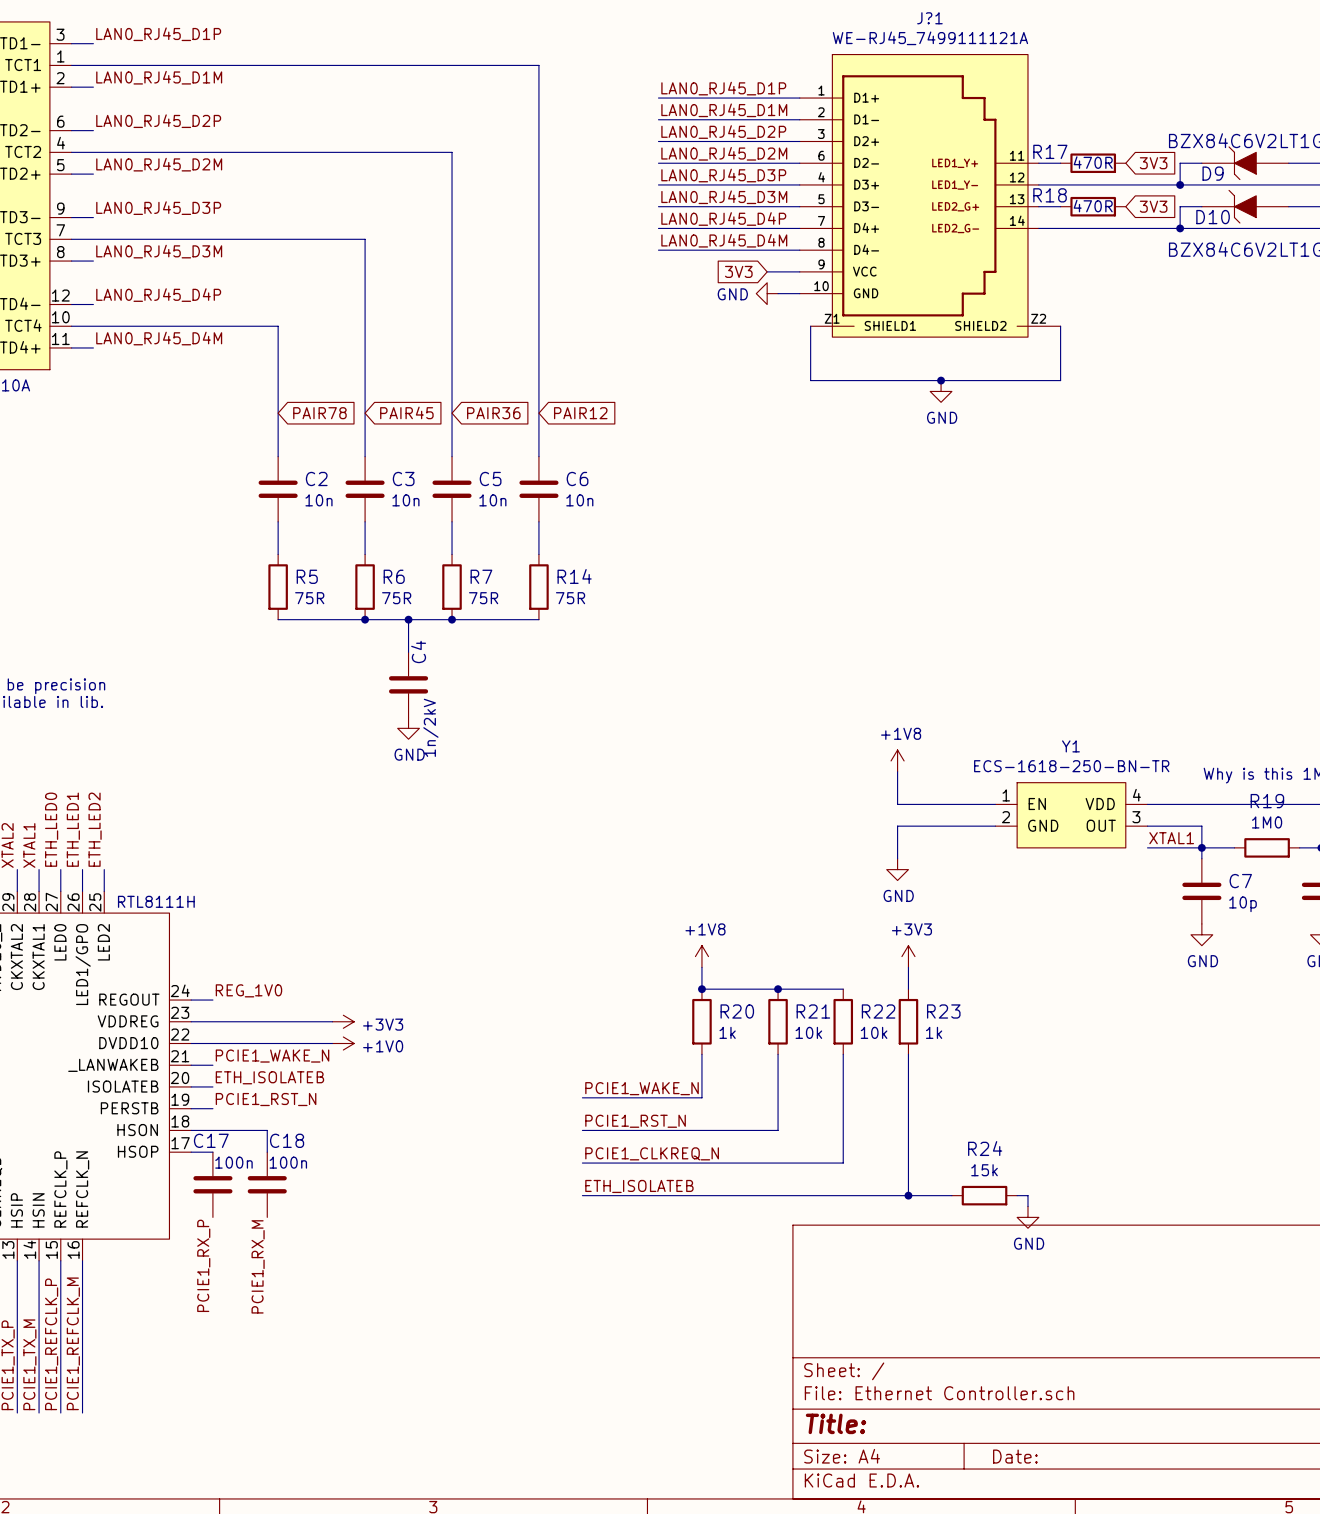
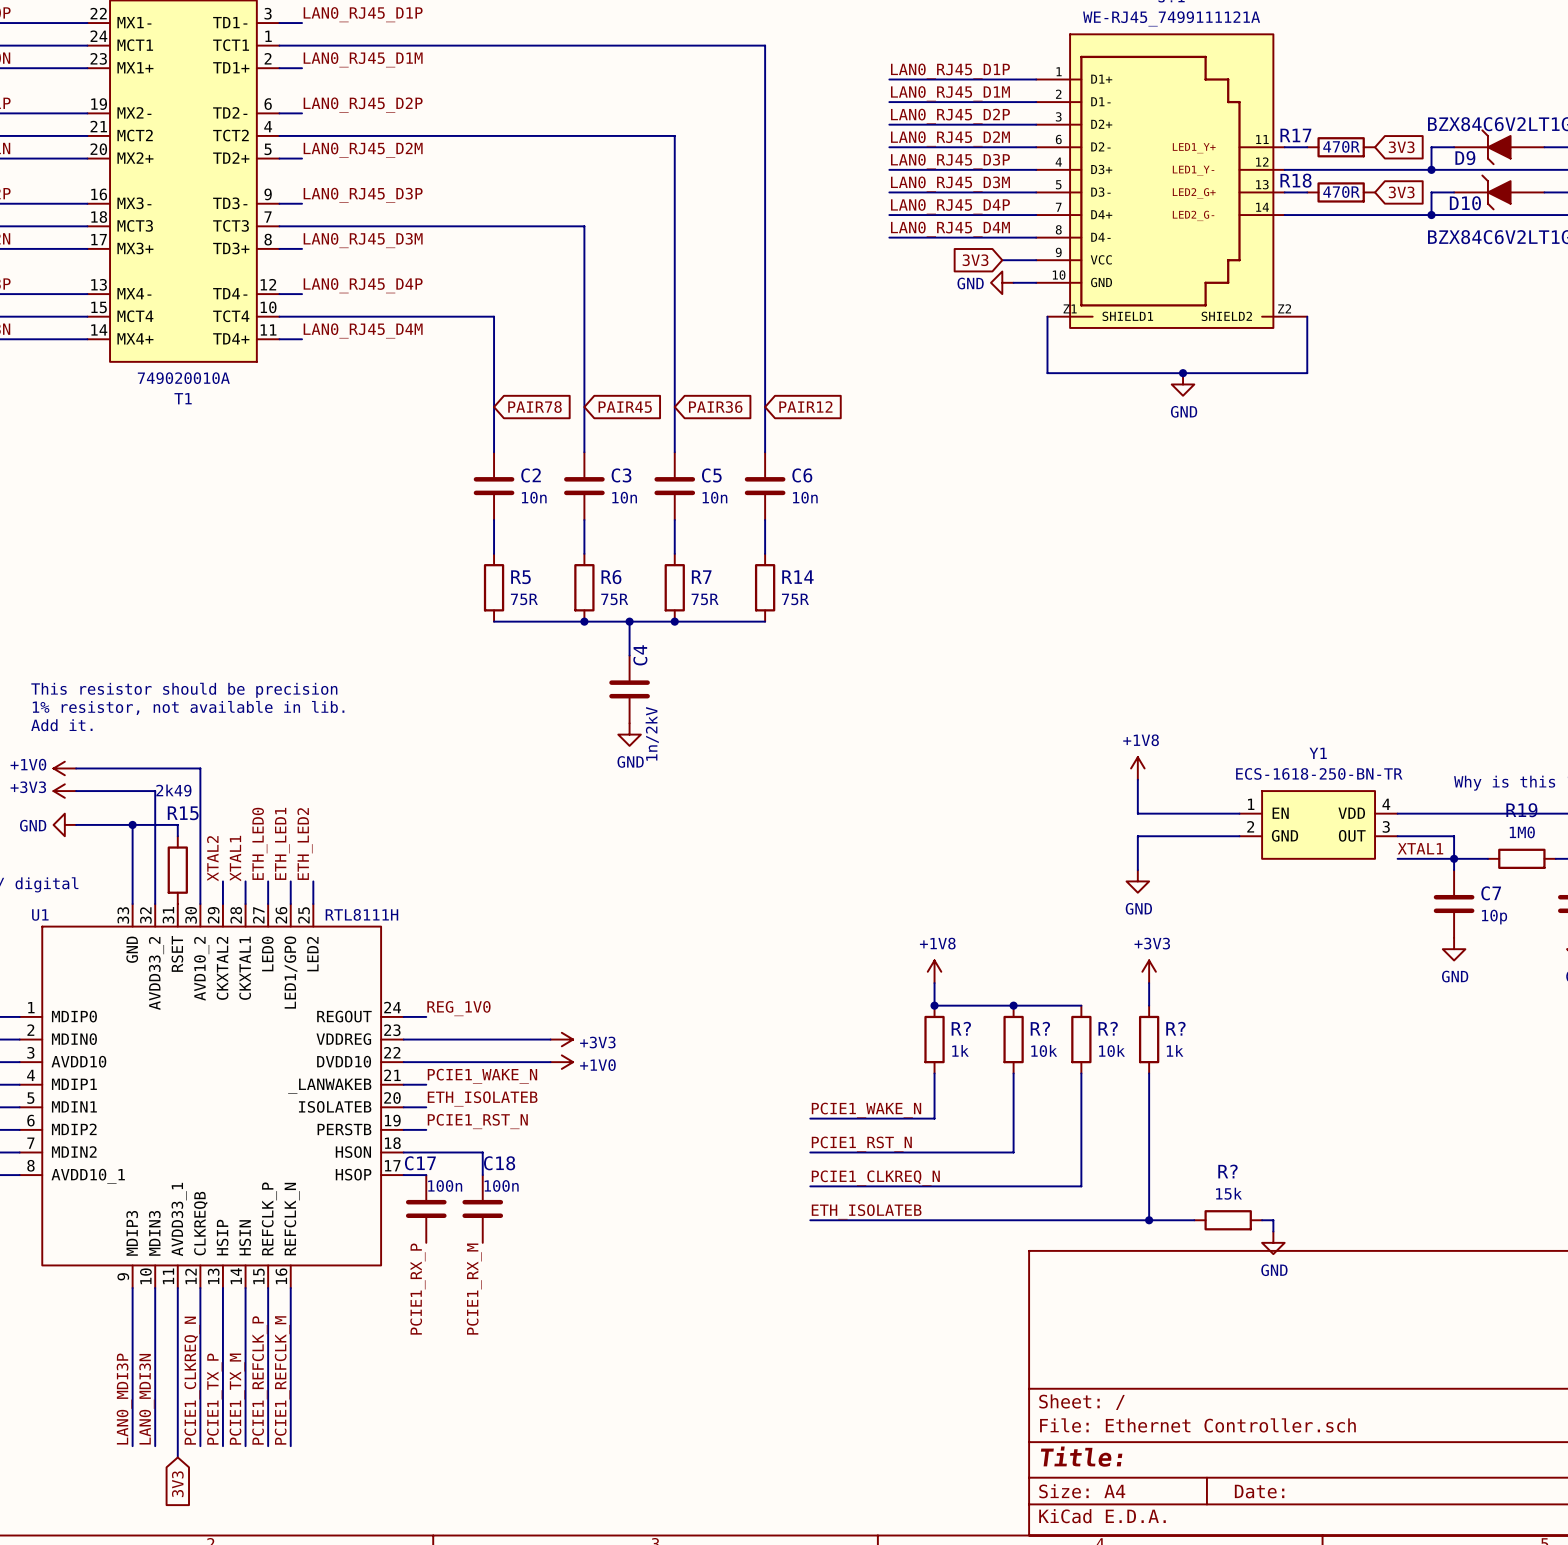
R20 name: R20 (737, 1011) -> R? (961, 1028)
R21 name: R21 (813, 1011) -> R? (1040, 1028)
R22 name: R22 (878, 1011) -> R? (1108, 1028)
R23 name: R23 (943, 1011) -> R? (1175, 1028)
R24 name: R24 (985, 1148) -> R? (1227, 1171)

